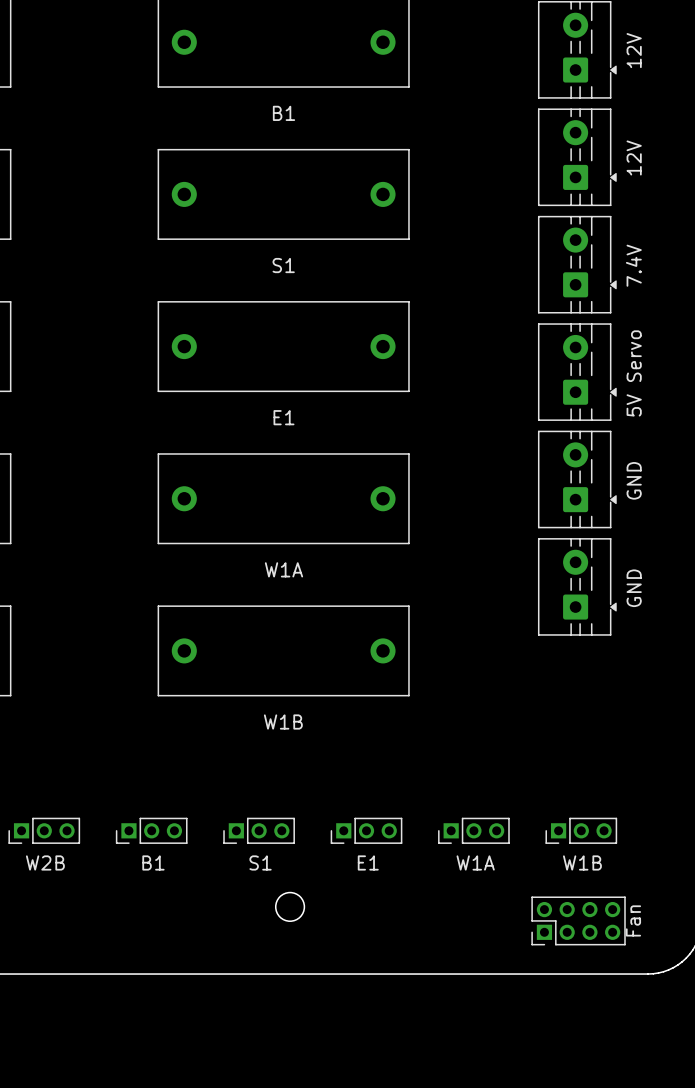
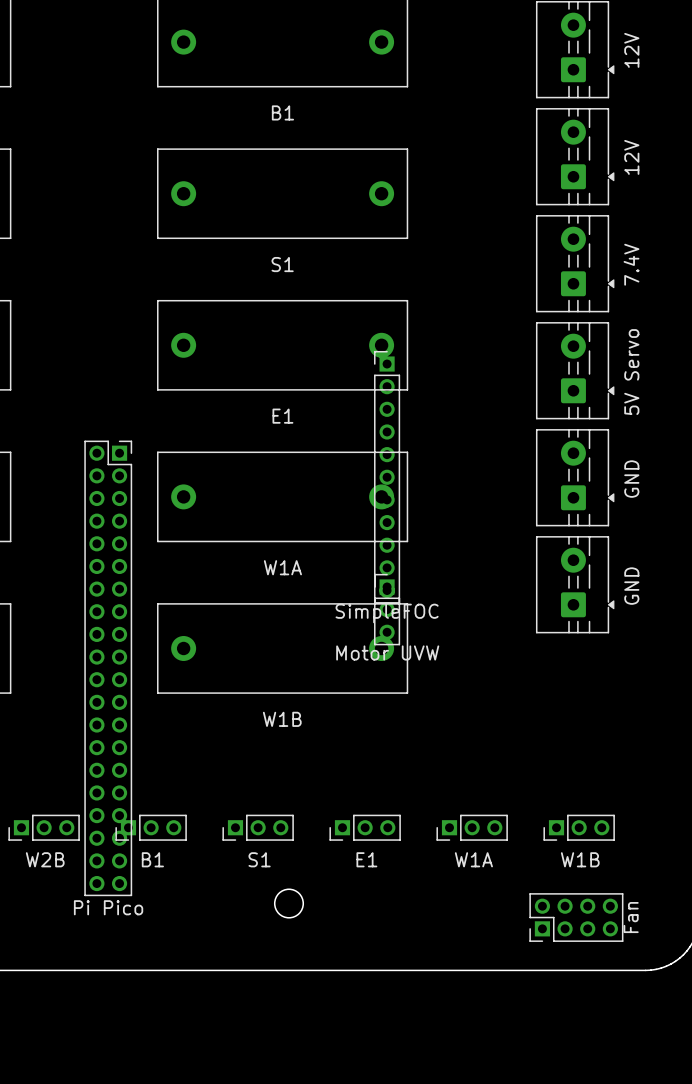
part: none -> SimpleFOC (387, 477)
part: none -> Motor UVW (387, 609)
part: none -> Pi Pico (108, 668)

